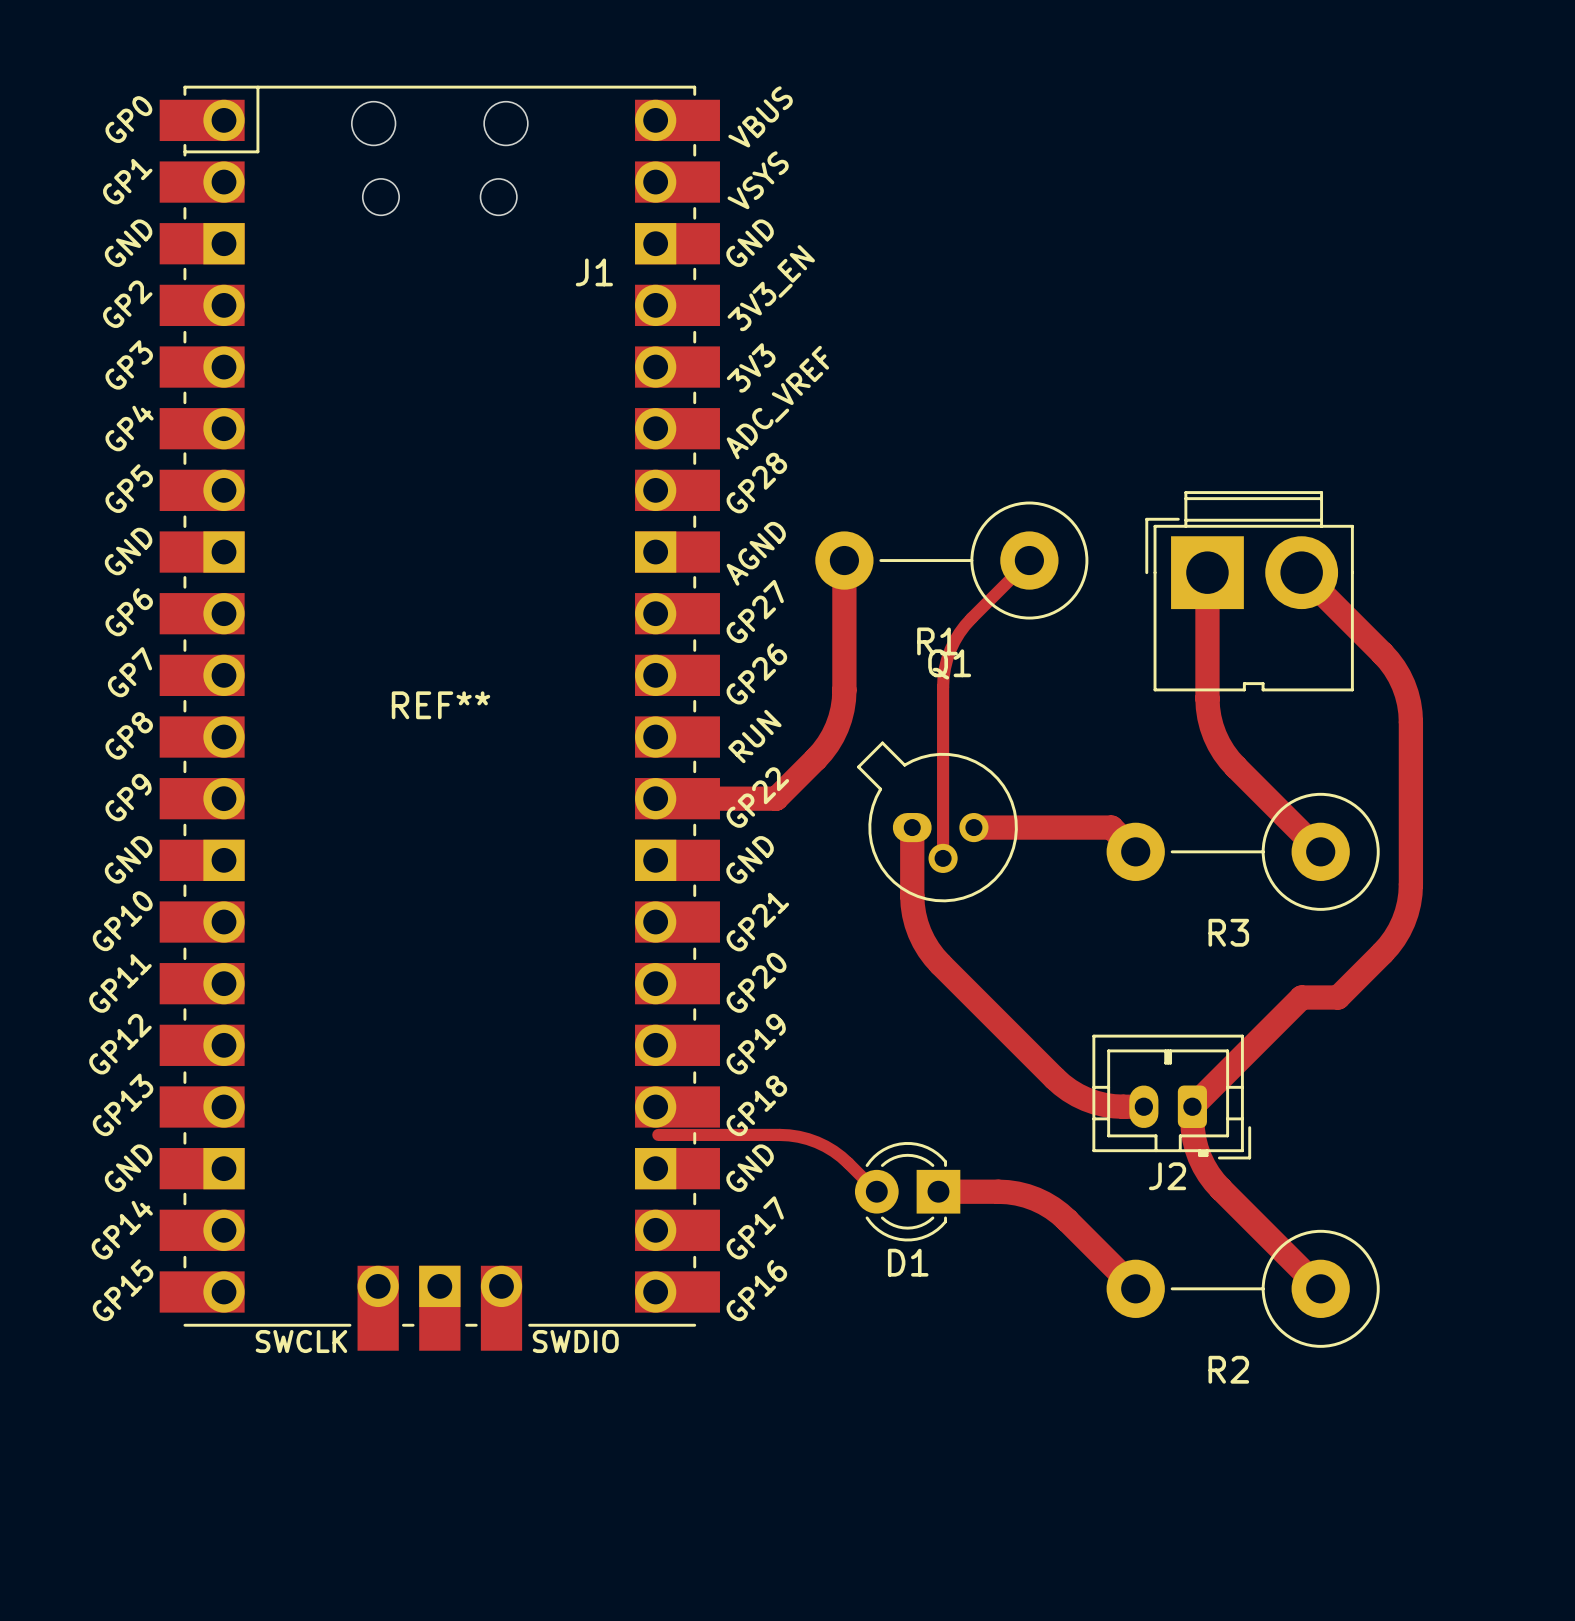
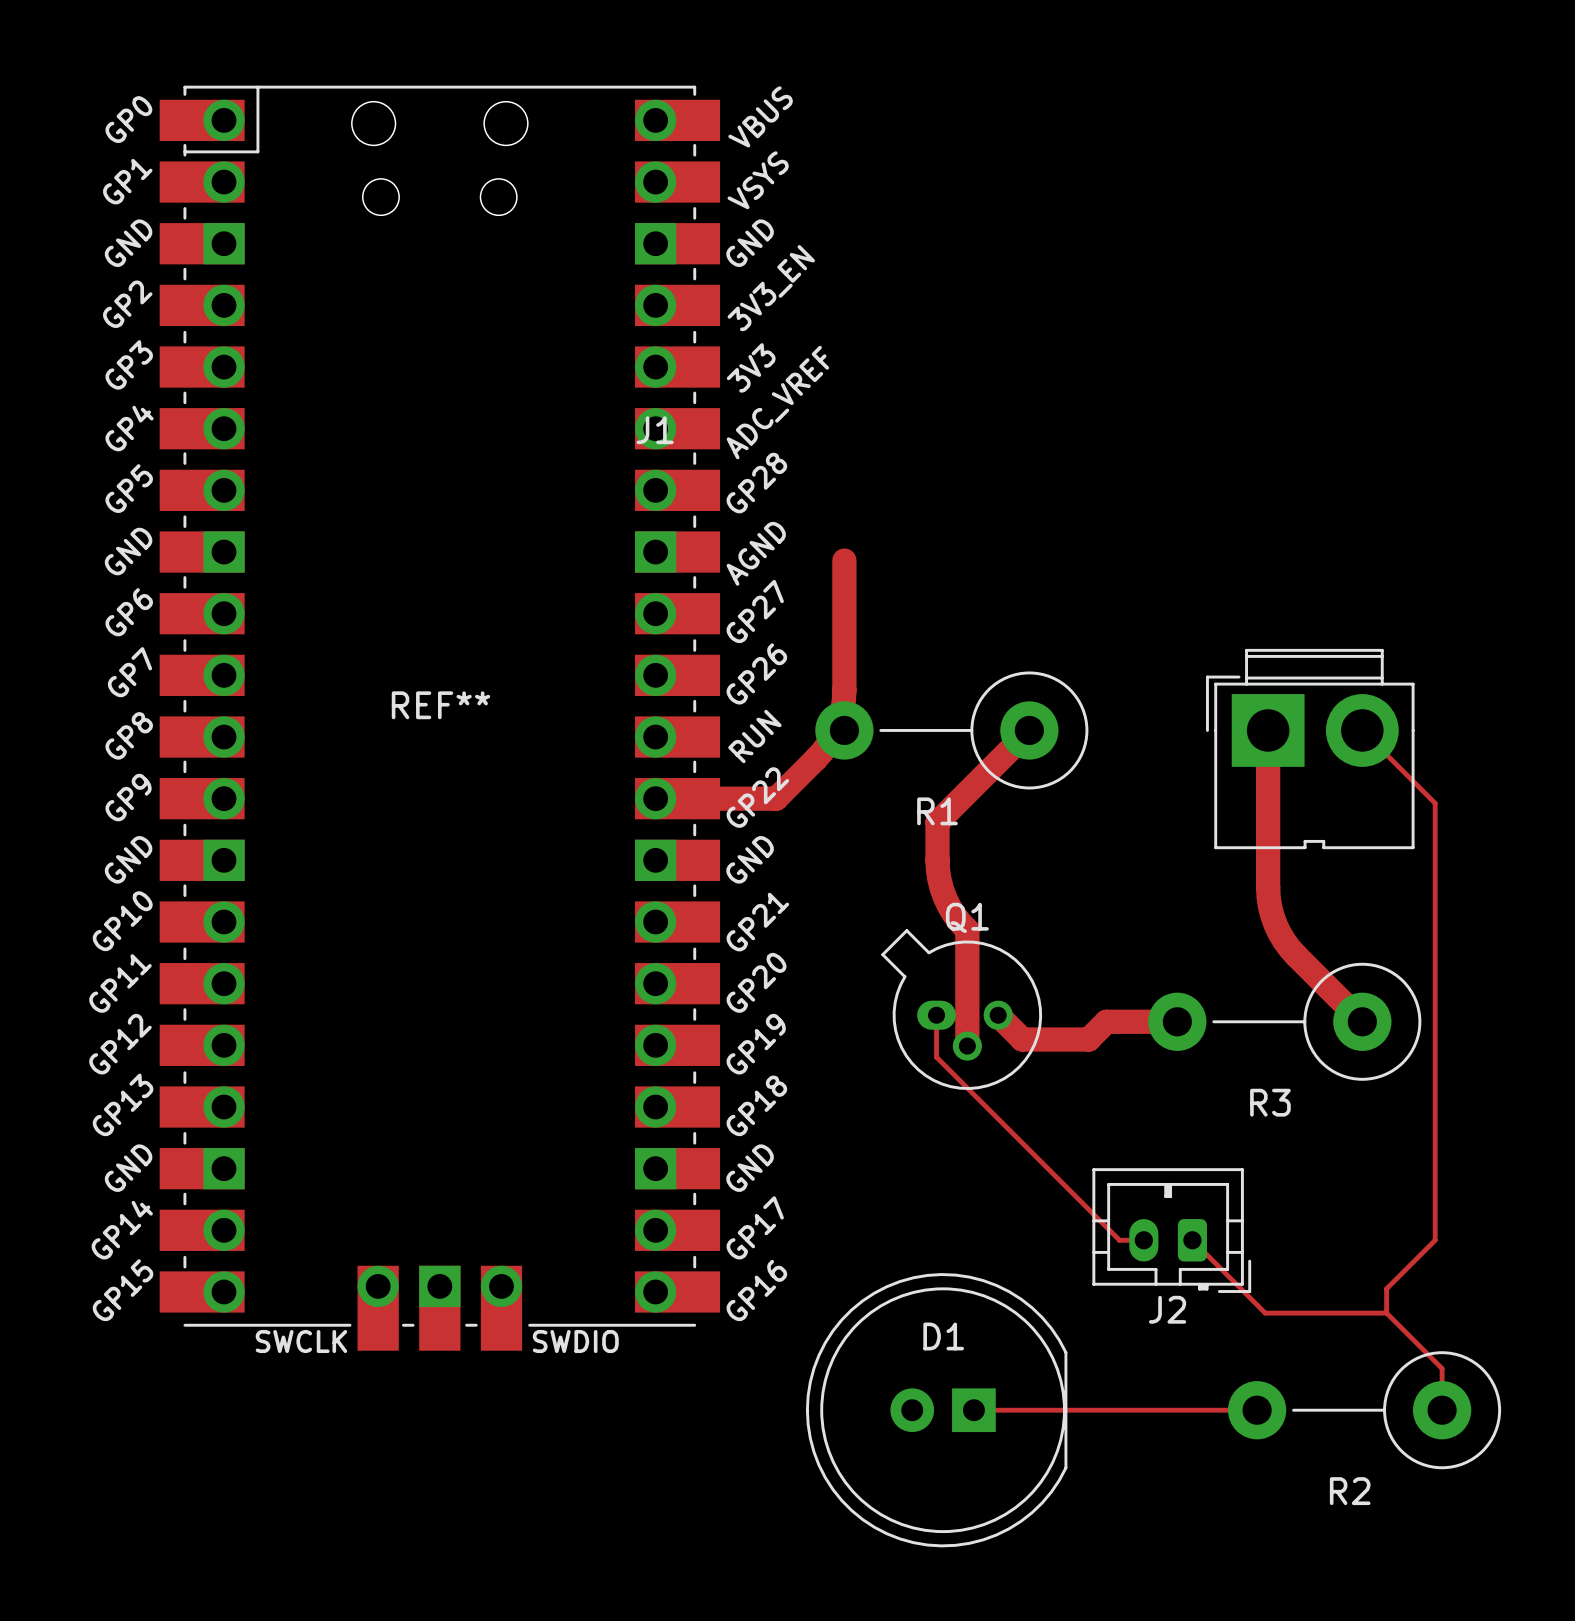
R1 position: (951, 560) -> (951, 730)
top track: (1029, 560) (965, 625) (954, 641) (947, 658) (943, 687) (943, 858) -> none
top track: (1207, 572) (1207, 698) (1209, 717) (1214, 735) (1223, 752) (1235, 767) (1320, 851) -> none
top track: (1301, 572) (1388, 660) (1399, 676) (1406, 693) (1410, 722) (1410, 884) (1409, 903) (1399, 930) (1382, 953) (1338, 997) (1301, 997) (1192, 1106) (1192, 1120) (1196, 1148) (1203, 1166) (1214, 1181) (1320, 1288) -> none
J1 position: (1249, 591) -> (1310, 749)
Q1 name position: Q1 (949, 664) -> Q1 (967, 917)
top track: none -> (1029, 730) (937, 822) (937, 869) (941, 888) (953, 914) (967, 930) (967, 1046)
top track: none -> (1268, 730) (1268, 887) (1272, 915) (1279, 933) (1290, 948) (1362, 1021)
top track: none -> (1362, 730) (1435, 803) (1435, 1240) (1386, 1288) (1386, 1313)
Q1 position: (937, 821) -> (961, 1009)
top track: (912, 827) (914, 914) (919, 932) (934, 957) (1054, 1078) (1069, 1090) (1086, 1099) (1104, 1104) (1143, 1106) -> none
top track: (973, 827) (1111, 827) (1135, 851) -> none
R3 position: (1243, 851) -> (1284, 1021)
top track: none -> (936, 1015) (936, 1057) (1119, 1240) (1143, 1240)
top track: none -> (998, 1015) (1022, 1039) (1088, 1039) (1106, 1021) (1177, 1021)
J2 position: (1171, 1097) -> (1171, 1230)
top track: (658, 1134) (779, 1134) (807, 1139) (825, 1146) (841, 1156) (876, 1191) -> none
D1 footprint: [854, 1142, 961, 1242] -> [805, 1273, 1068, 1548]
top track: (938, 1191) (1007, 1192) (1026, 1195) (1044, 1203) (1067, 1220) (1135, 1288) -> none
top track: none -> (1192, 1240) (1265, 1313) (1386, 1313)
D1 name position: D1 (908, 1262) -> D1 (943, 1336)
R2 position: (1243, 1288) -> (1364, 1410)
top track: none -> (1386, 1313) (1442, 1368) (1442, 1410)
top track: none -> (973, 1410) (1257, 1410)

